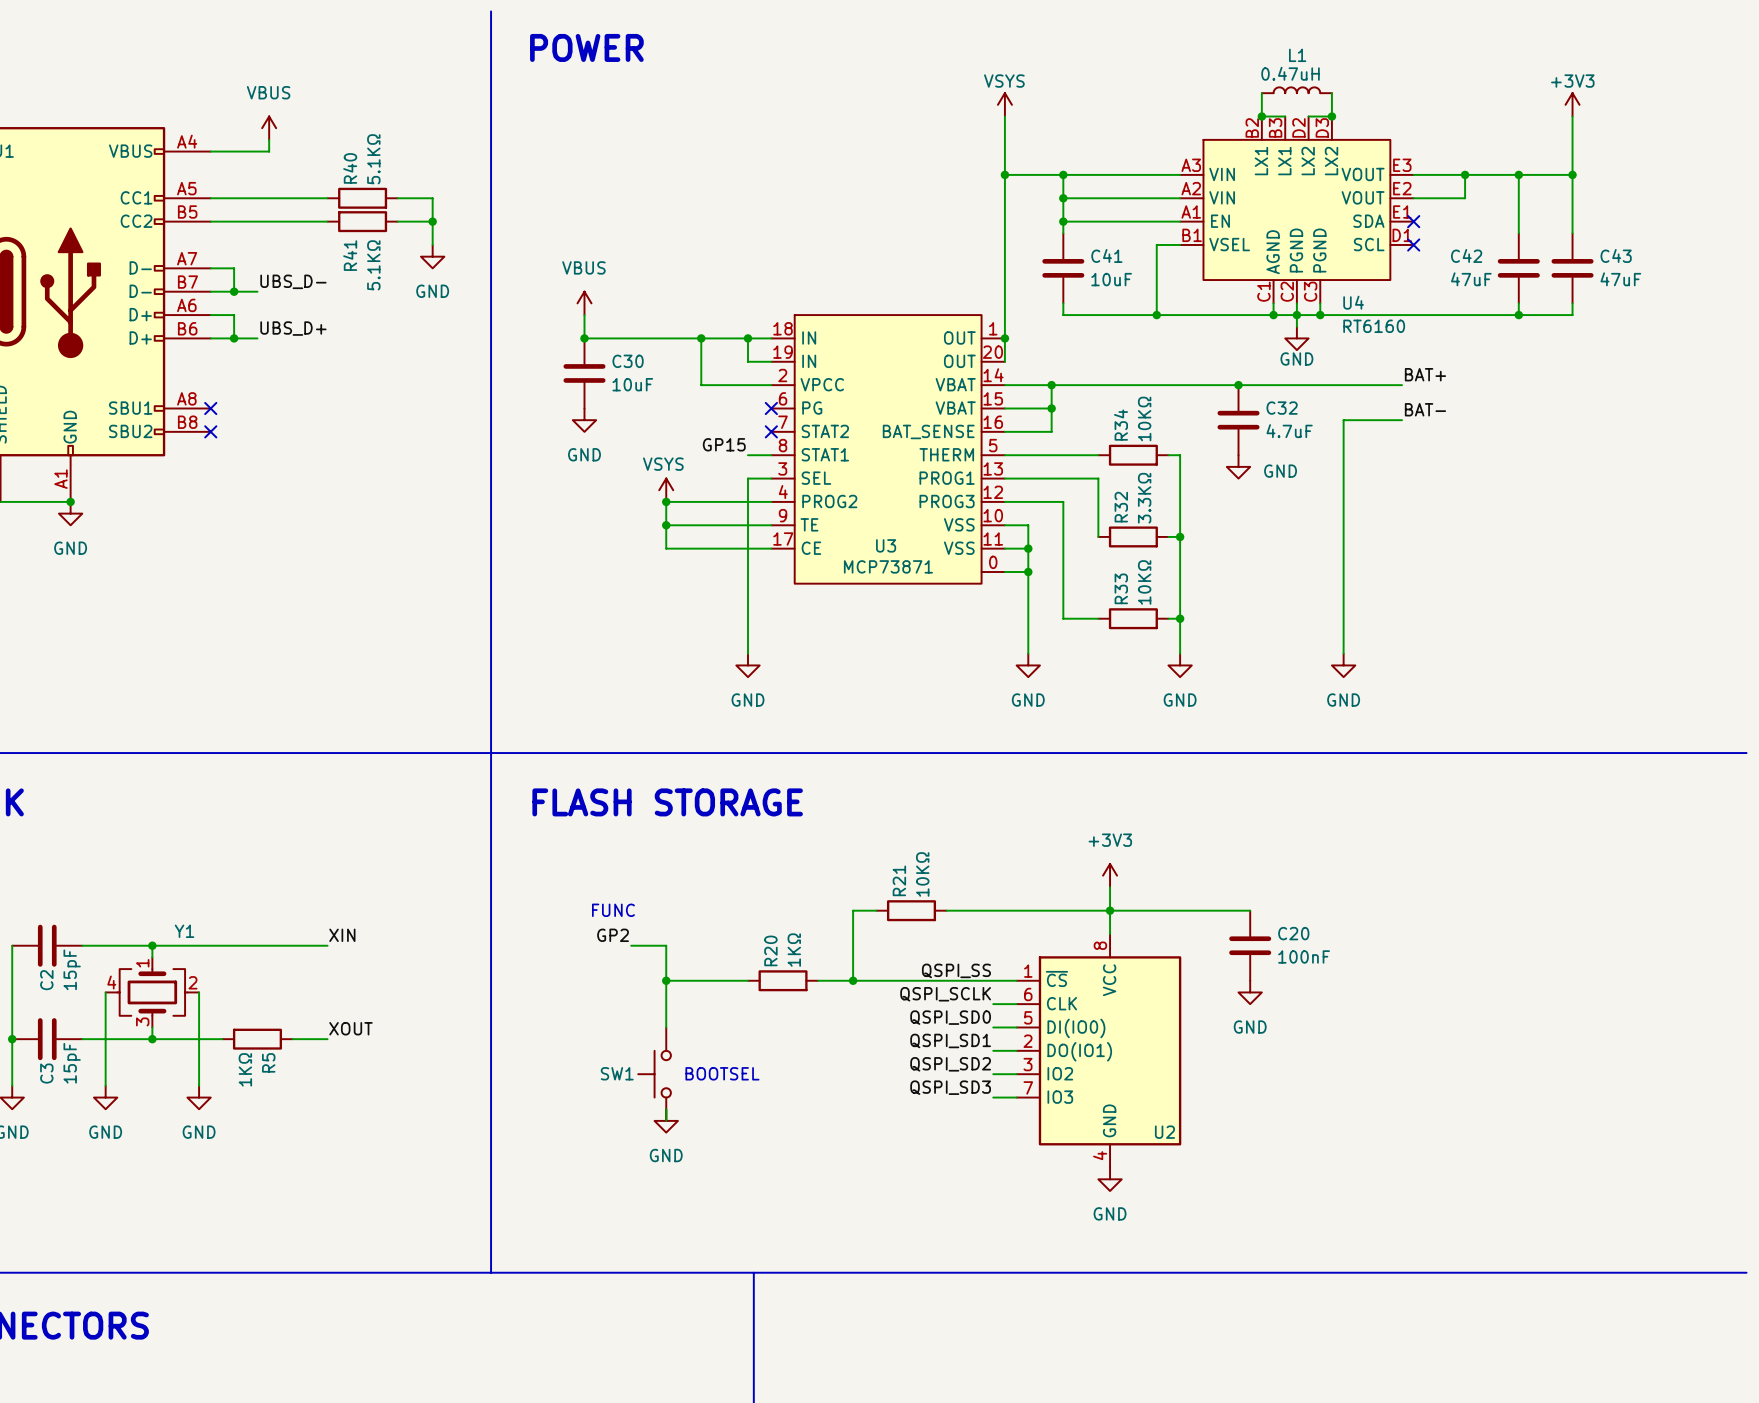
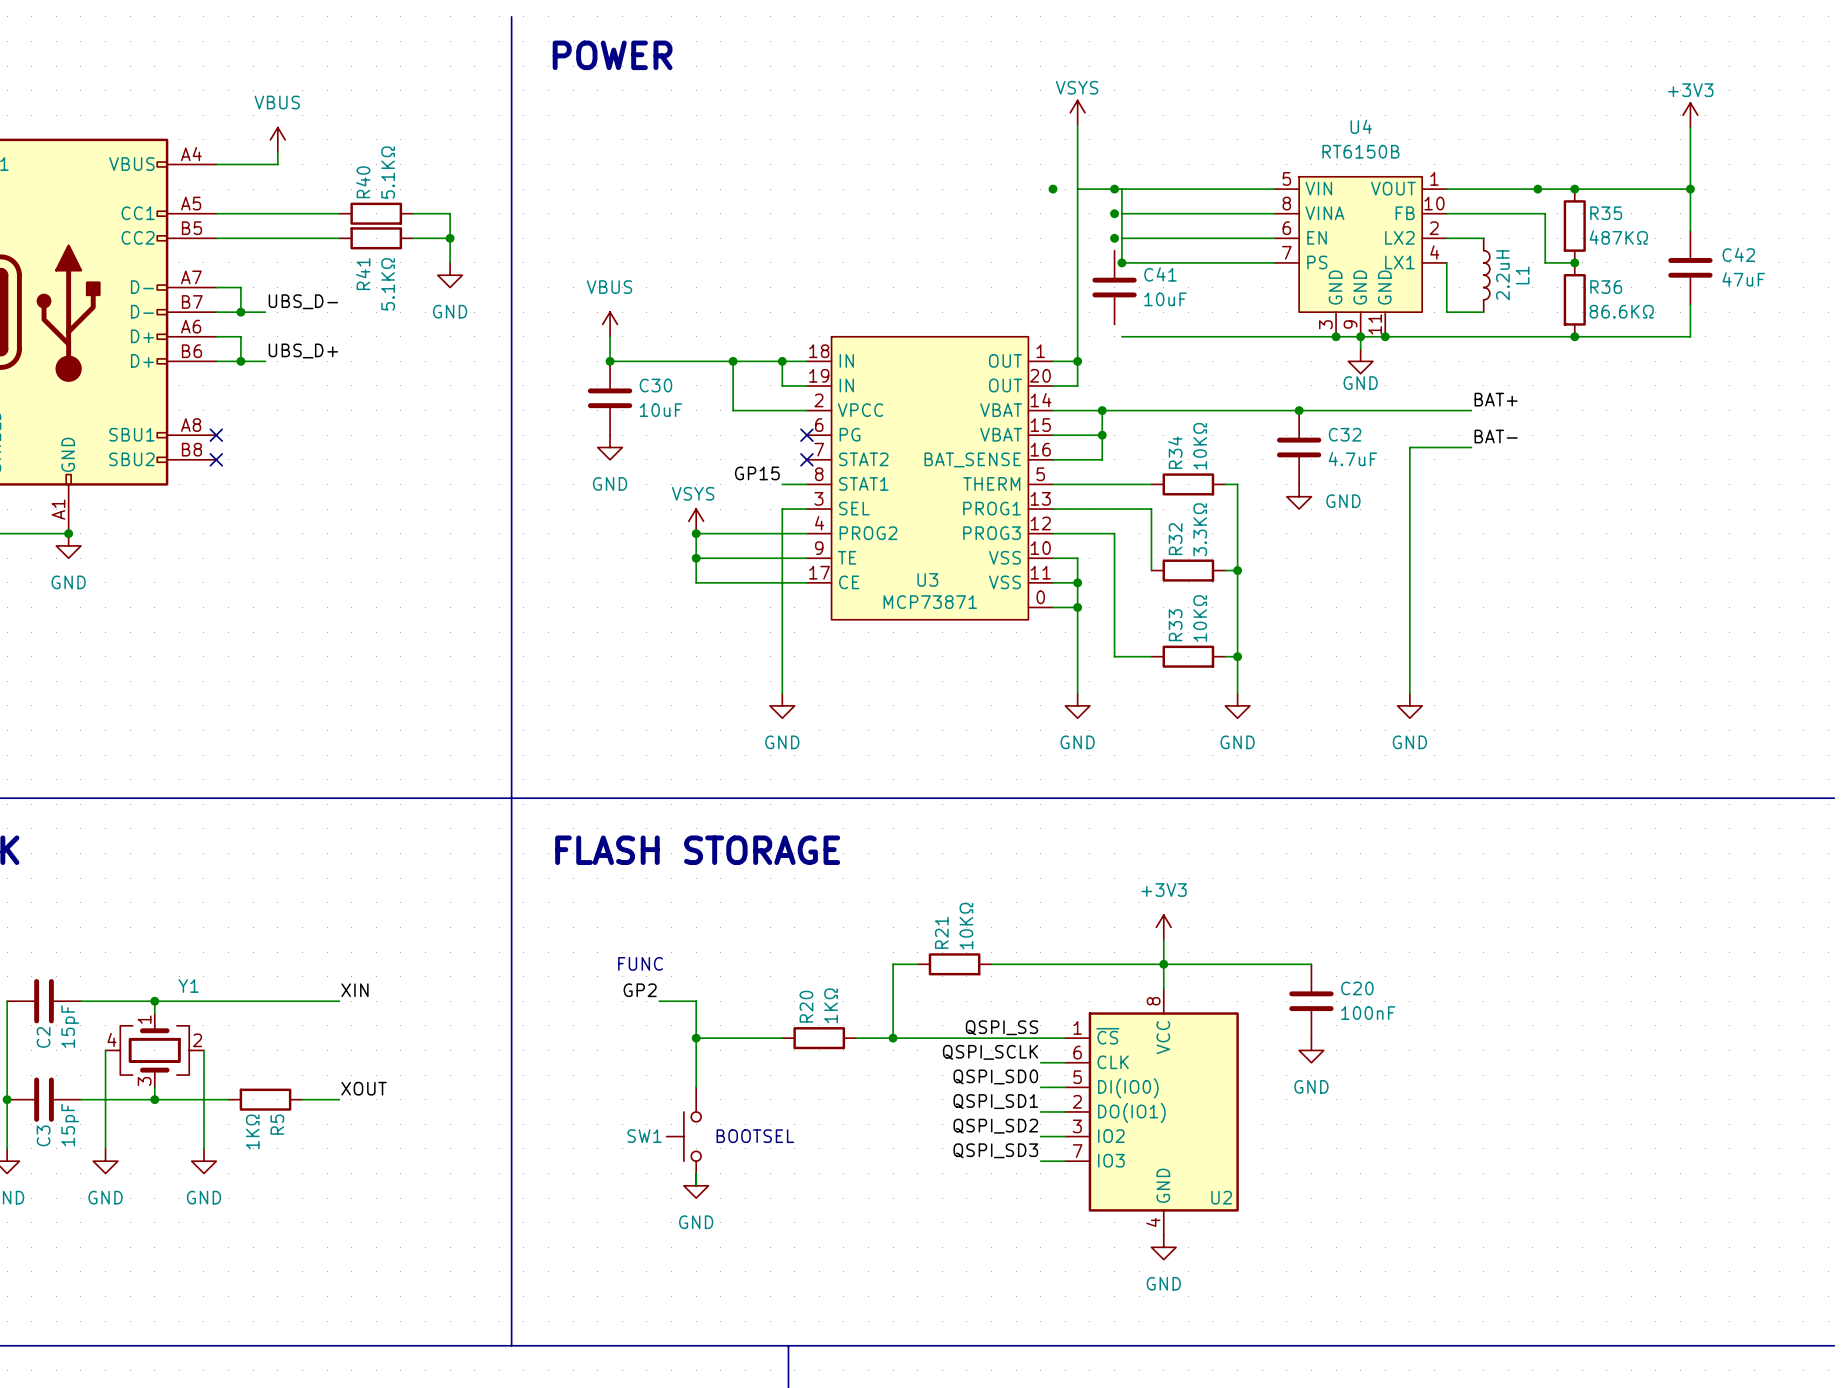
L1 value: 0.47uH (1290, 73) -> 2.2uH (1502, 275)
L1 rotation: 0° (1296, 90) -> 90° clockwise (1486, 275)
L1 position: (1296, 90) -> (1486, 275)
wire: (1261, 93) (1261, 116) (1285, 116) -> none
wire: (1331, 93) (1331, 116) (1308, 116) -> none
power symbol position: VSYS (1004, 104) -> VSYS (1077, 112)
power symbol position: +3V3 (1572, 104) -> +3V3 (1690, 115)
wire: (1004, 116) (1004, 361) -> (1077, 125) (1077, 385) (1053, 385)
U4 symbol: [1180, 116, 1414, 304] -> [1274, 176, 1447, 337]
junction: (1261, 116) -> none
junction: (1331, 116) -> none
wire: (1572, 116) (1572, 233) -> none
wire: none -> (1690, 127) (1690, 230)
wire: (1004, 174) (1028, 174) -> (1053, 361) (1077, 361)
wire: (1063, 174) (1063, 233) -> none
wire: (1465, 174) (1465, 198) -> (1574, 262) (1545, 262) (1545, 213) (1537, 213)
wire: (1518, 174) (1518, 233) -> none
junction position: (1518, 174) -> (1574, 189)
wire: none -> (1651, 189) (1690, 189)
junction: (1572, 174) -> none
junction: none -> (1690, 189)
R35: none -> 487KΩ (1574, 226)
no-connect mark: (1413, 221) -> none
junction: none -> (1121, 262)
wire: (1156, 244) (1156, 315) -> (1212, 262) (1121, 262) (1121, 189)
wire: none -> (1446, 262) (1446, 312) (1483, 312)
no-connect mark: (1413, 244) -> none
junction: none -> (1574, 262)
C42 name position: C42 (1466, 255) -> C42 (1738, 254)
C42 position: (1518, 268) -> (1690, 267)
C43: 47uF (1572, 268) -> none
C42 value position: 47uF (1471, 279) -> 47uF (1743, 279)
R36: none -> 86.6KΩ (1574, 299)
U4 name position: U4 (1353, 302) -> U4 (1361, 126)
wire: (1063, 303) (1063, 315) (1070, 315) -> none
wire: (1518, 303) (1518, 315) -> none
wire: (1572, 303) (1572, 315) -> (1690, 304) (1690, 336) (1651, 336)
junction: (1156, 315) -> none
junction position: (1518, 315) -> (1574, 336)
U4 value: RT6160 (1374, 326) -> RT6150B (1360, 151)
junction position: (1004, 338) -> (1077, 361)

